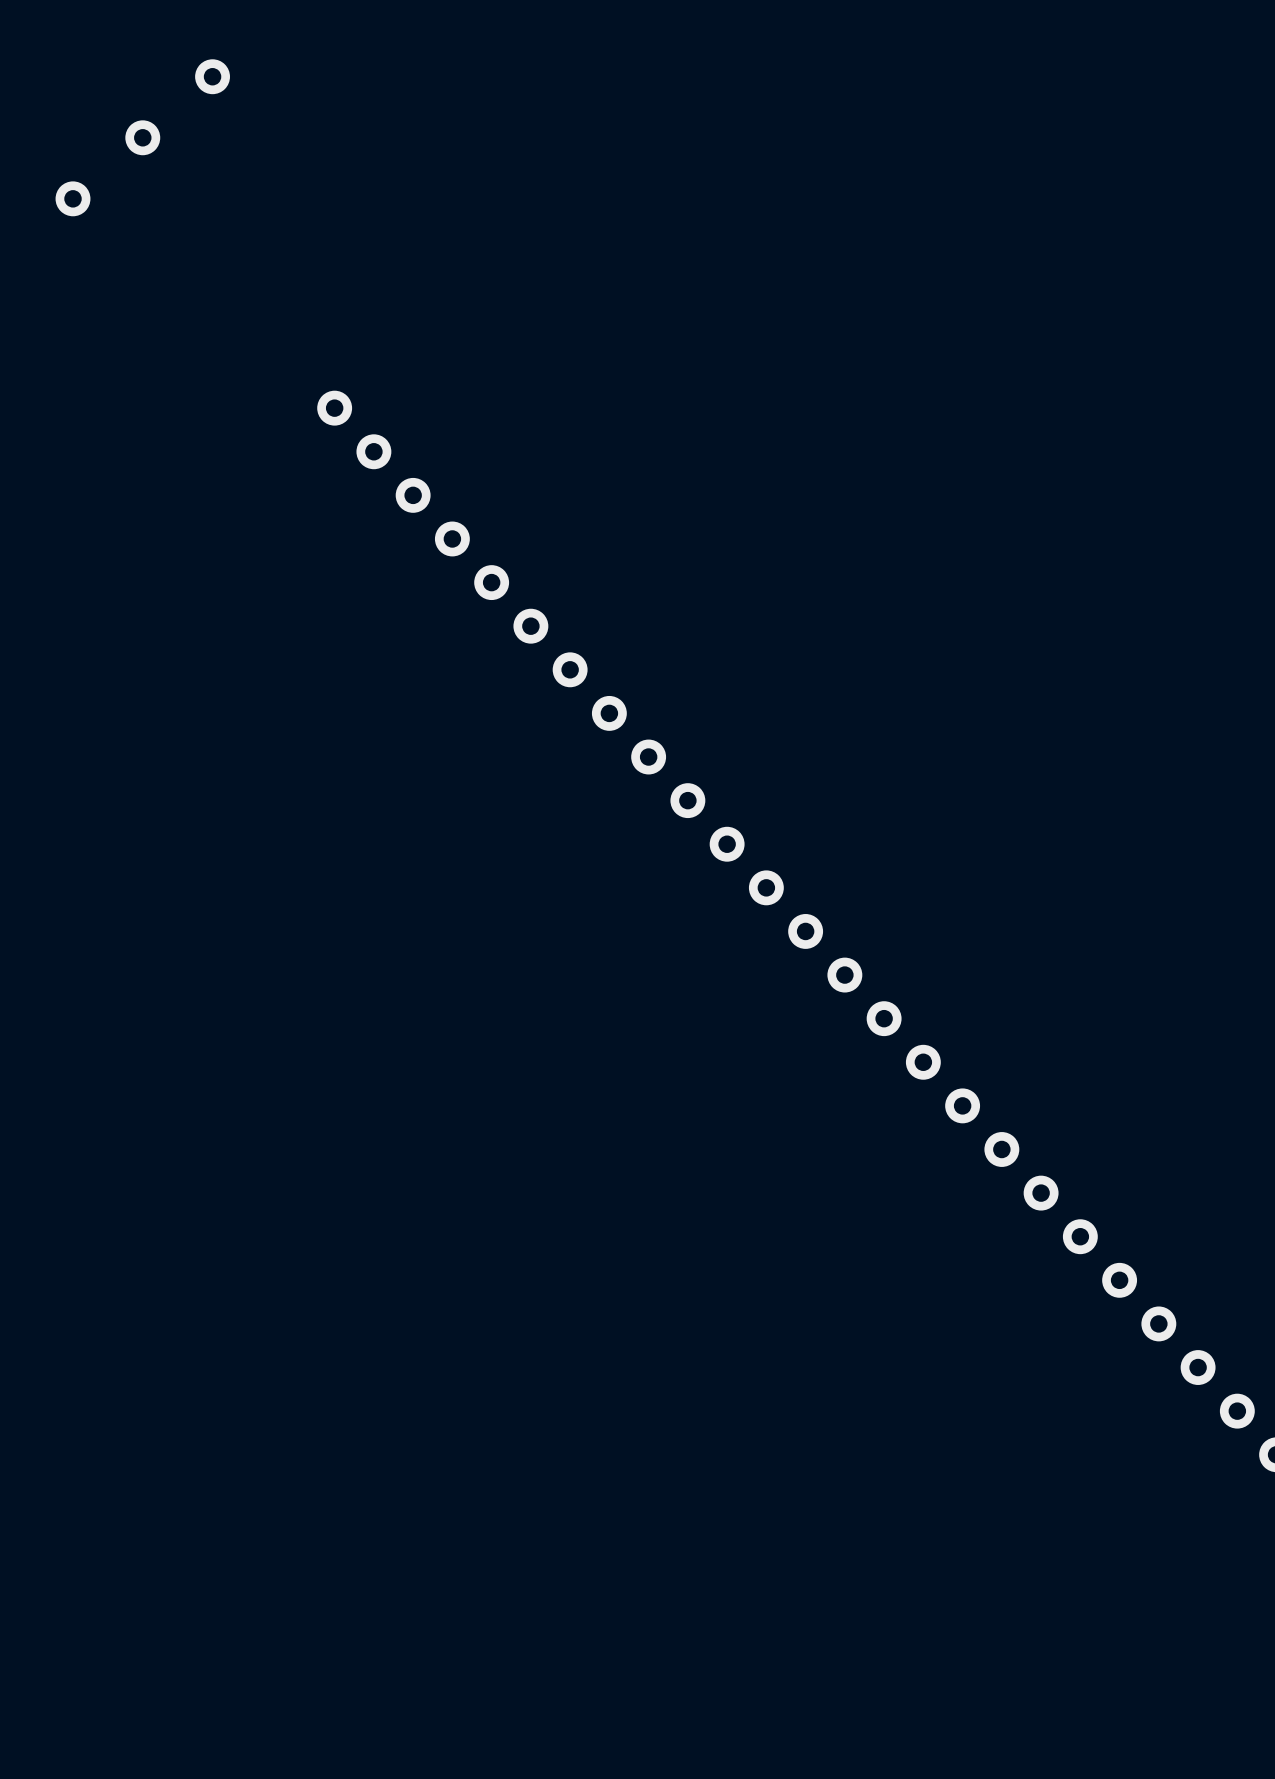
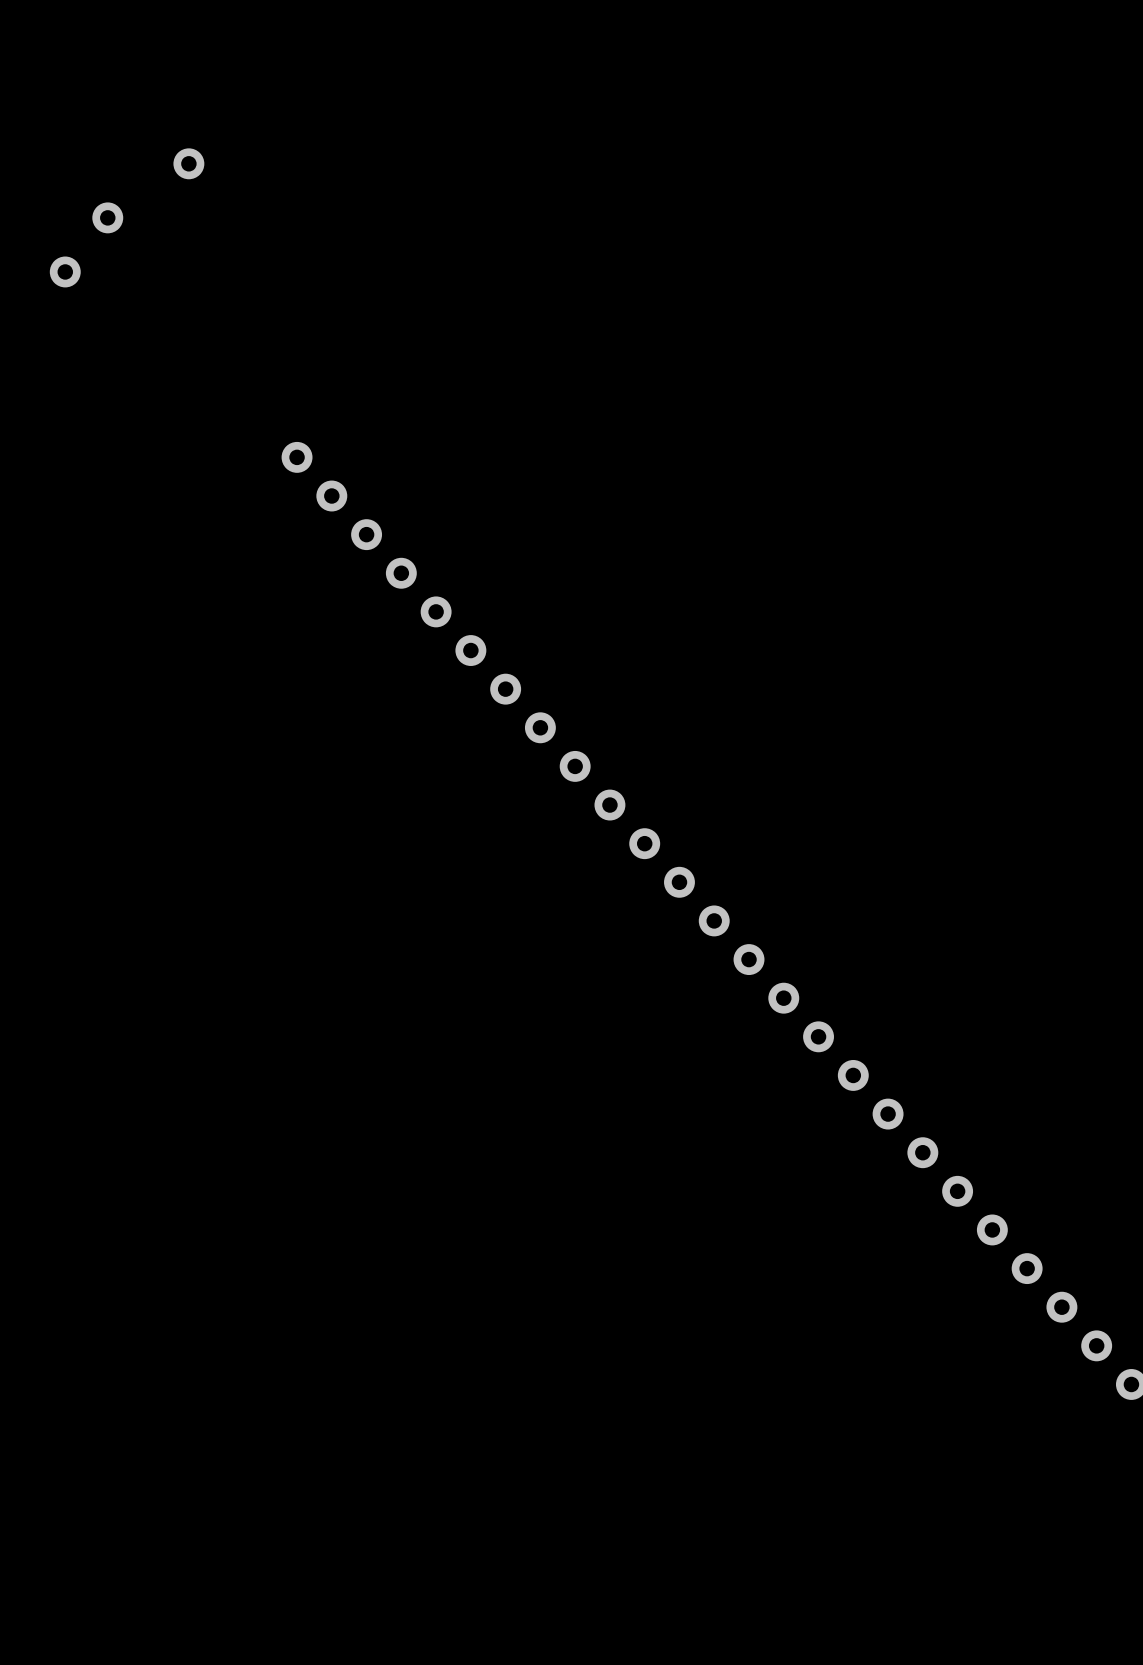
via position: (142, 137) -> (107, 217)

